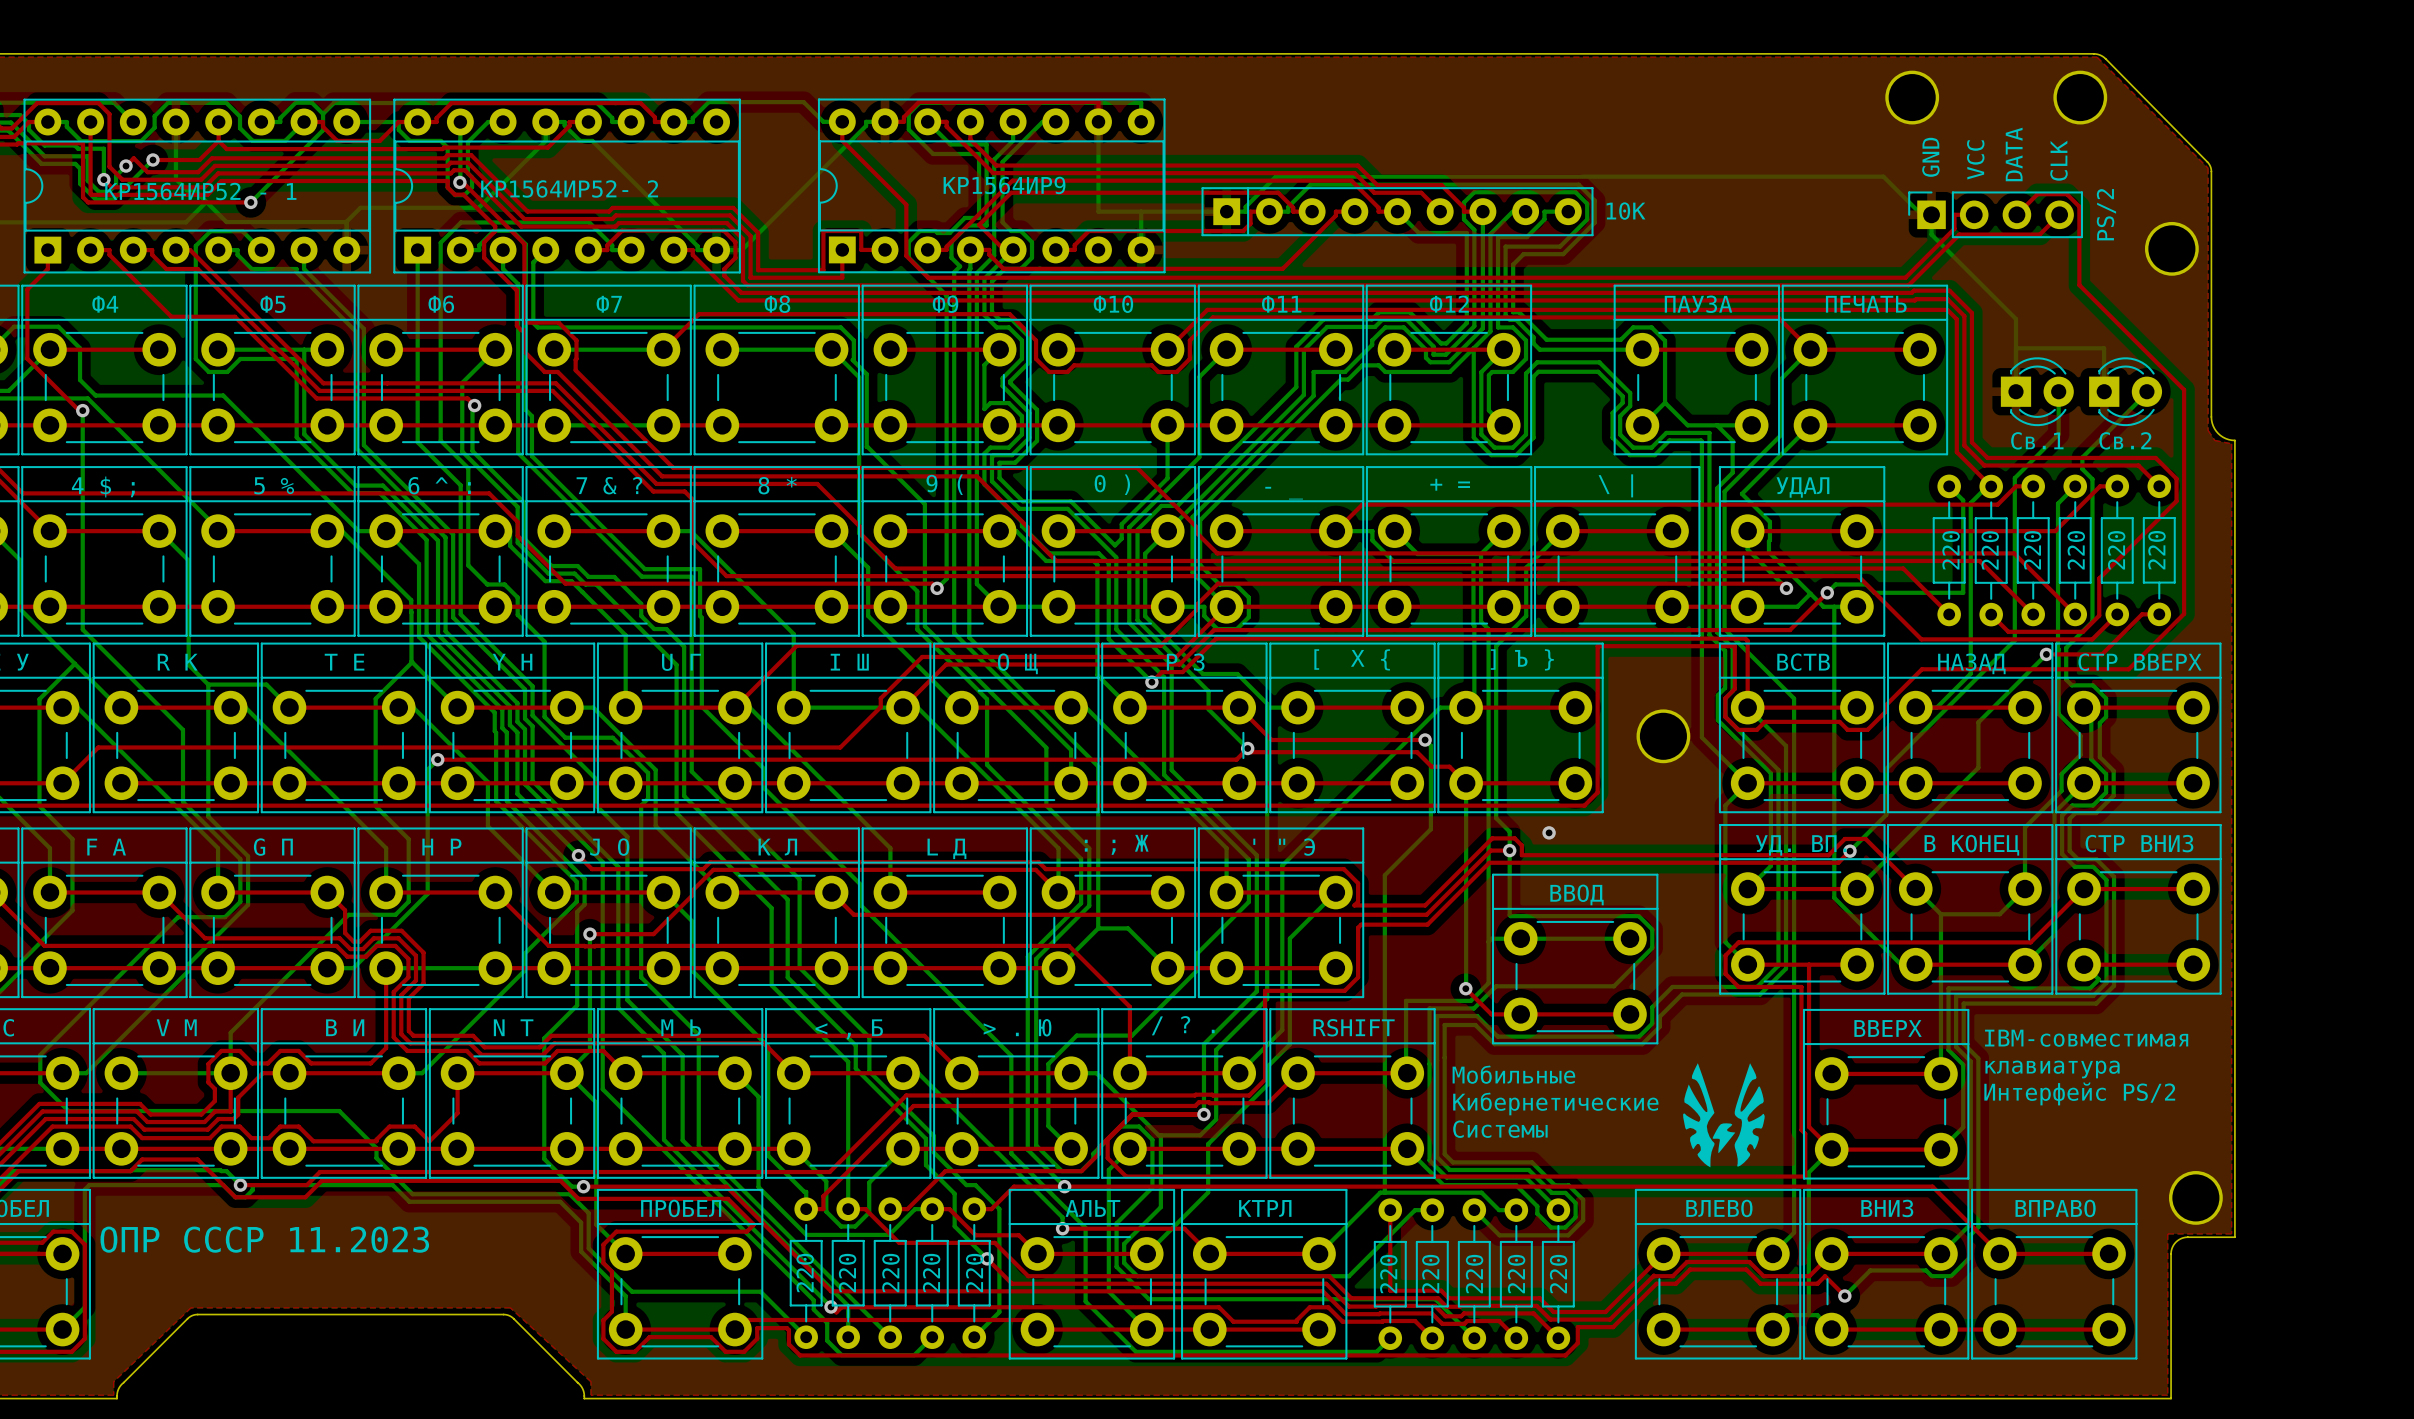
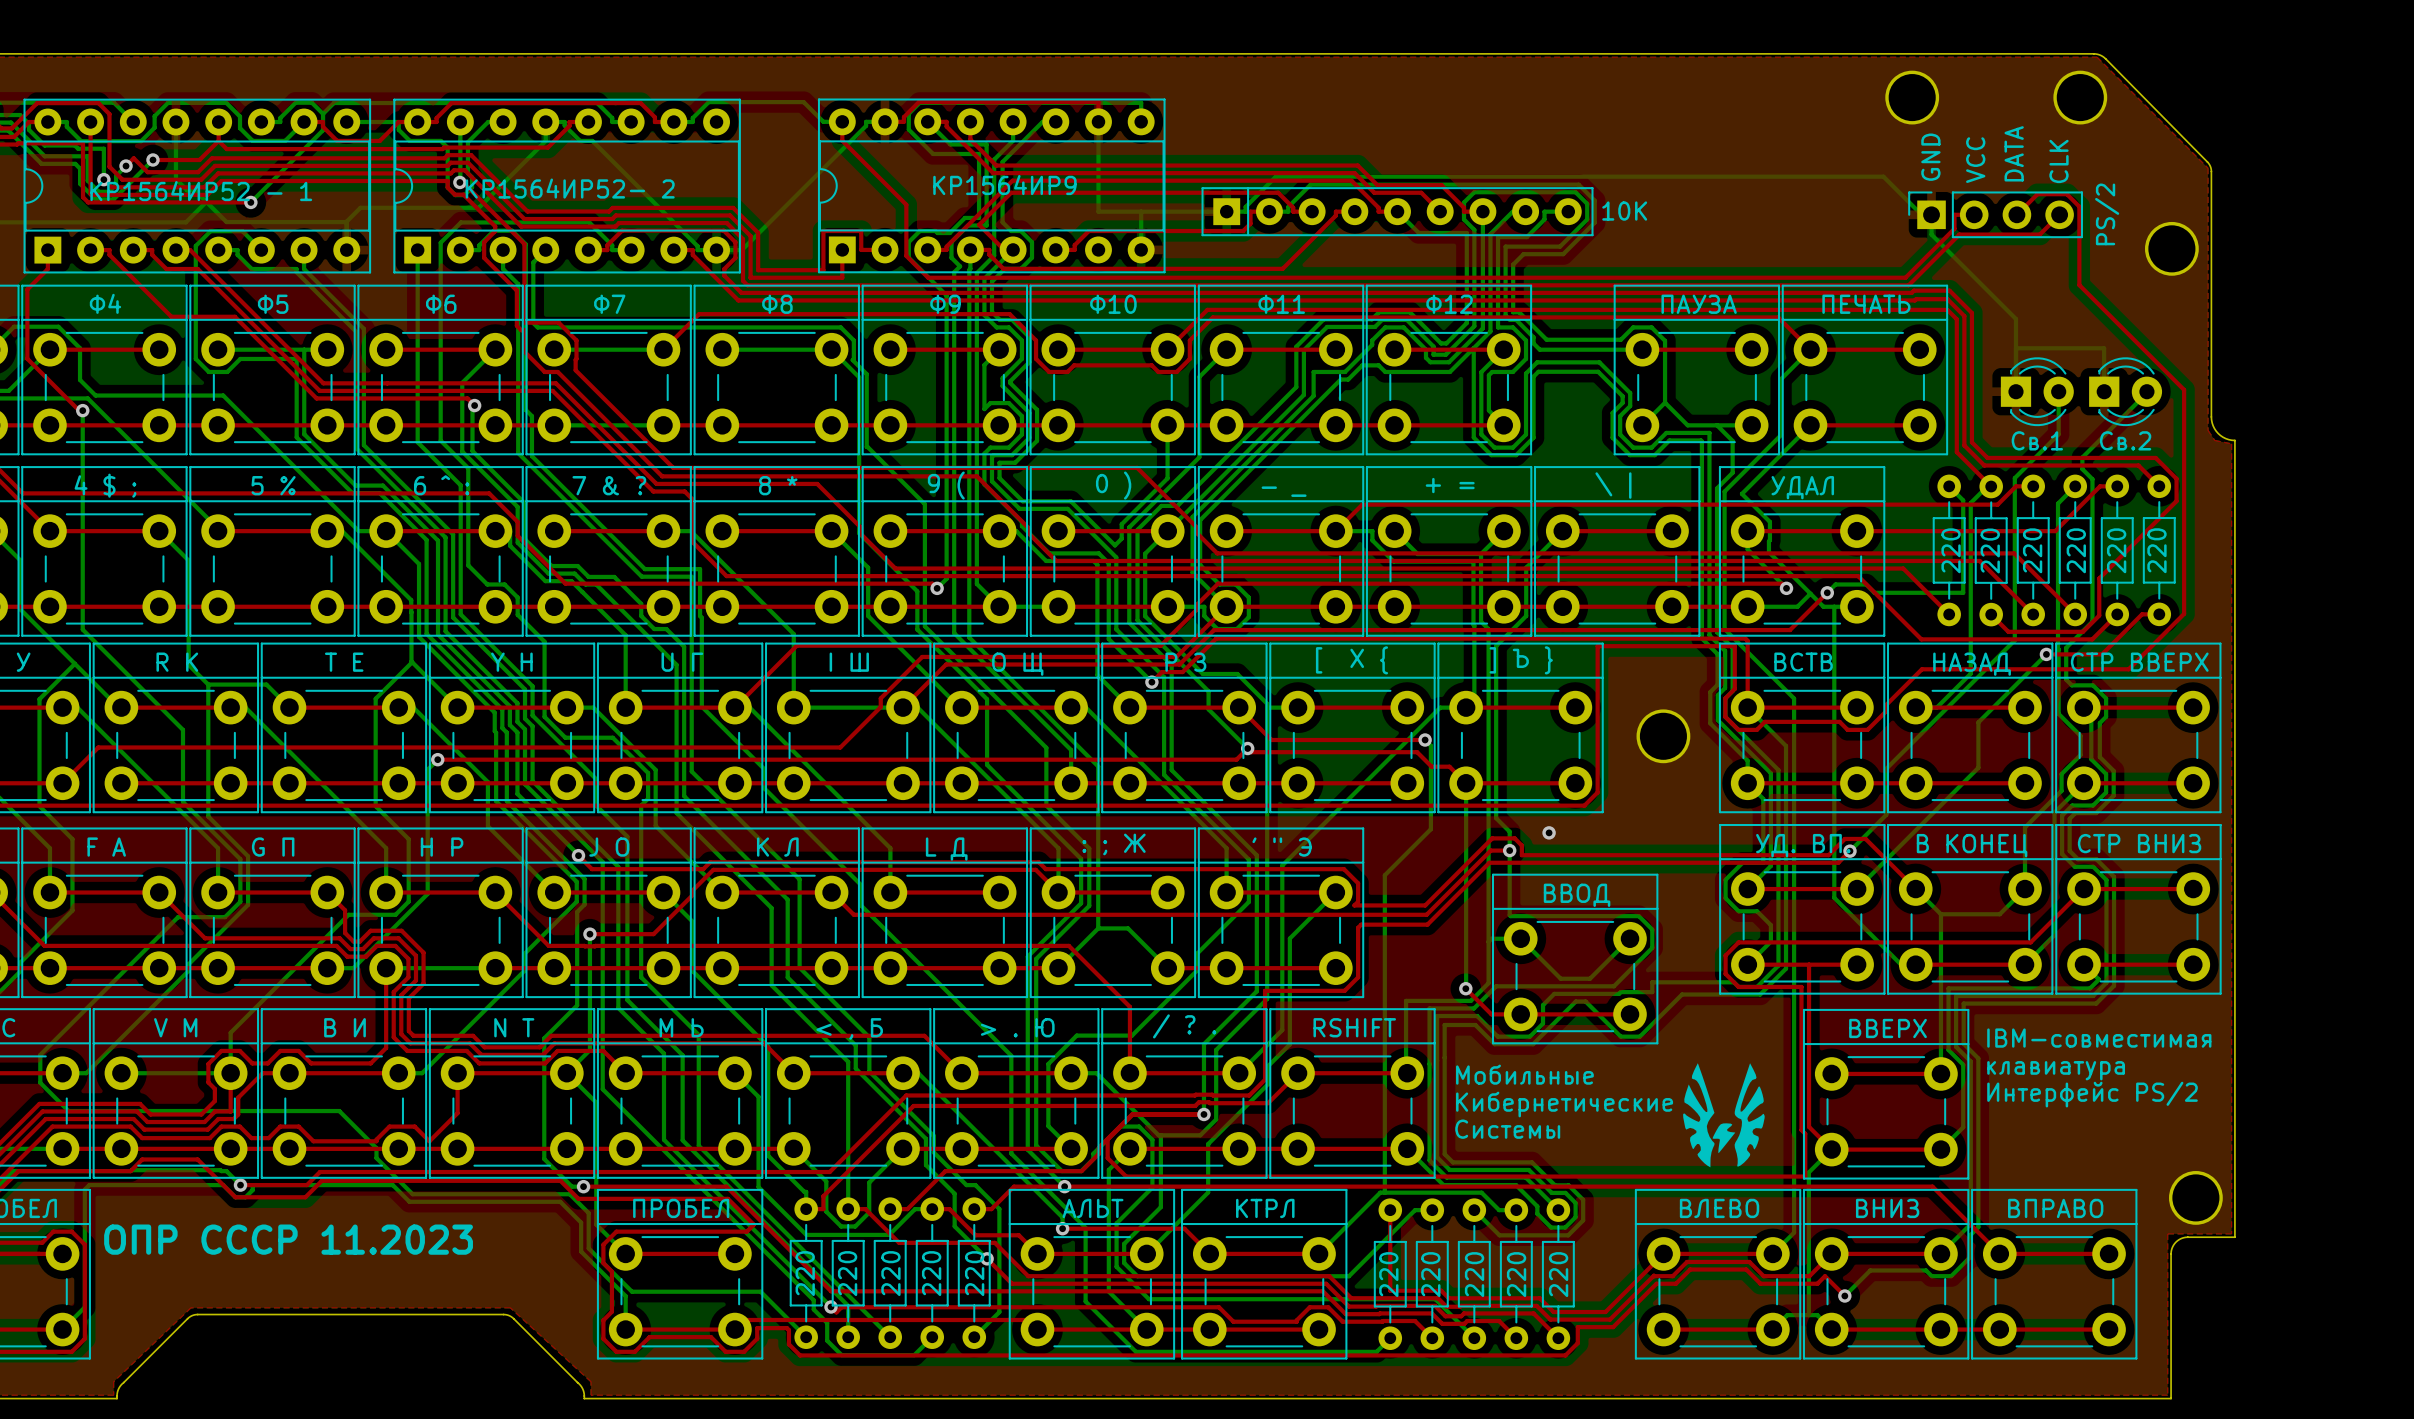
bottom track: (1701, 638) (1701, 737) (1747, 783) (1725, 805) (1725, 942) (1747, 964) -> (1701, 638) (1717, 654) (1717, 684) (1710, 692) (1710, 723) (1747, 760) (1747, 783) (1763, 798) (1763, 862) (1742, 862) (1725, 879) (1725, 898) (1738, 911) (1757, 911) (1770, 925) (1770, 941) (1747, 964)
bottom track: (1520, 938) (1630, 938) -> (1520, 938) (1560, 978) (1590, 978) (1630, 938)
bottom track: (1738, 986) (1672, 986) (1652, 1007) (1652, 1023) (1639, 1036) -> (1659, 1016) (1639, 1036)
bottom track: none -> (1738, 986) (1733, 982) (1652, 982) (1652, 992) (1554, 993) (1543, 1005) (1543, 1023) (1529, 1036)
bottom track: (1659, 1016) (1659, 1026) (1642, 1044) (1533, 1044) -> none
bottom track: (1529, 1036) (1620, 1036) -> (1533, 1044) (1575, 1001) (1585, 1001) (1620, 1036)

